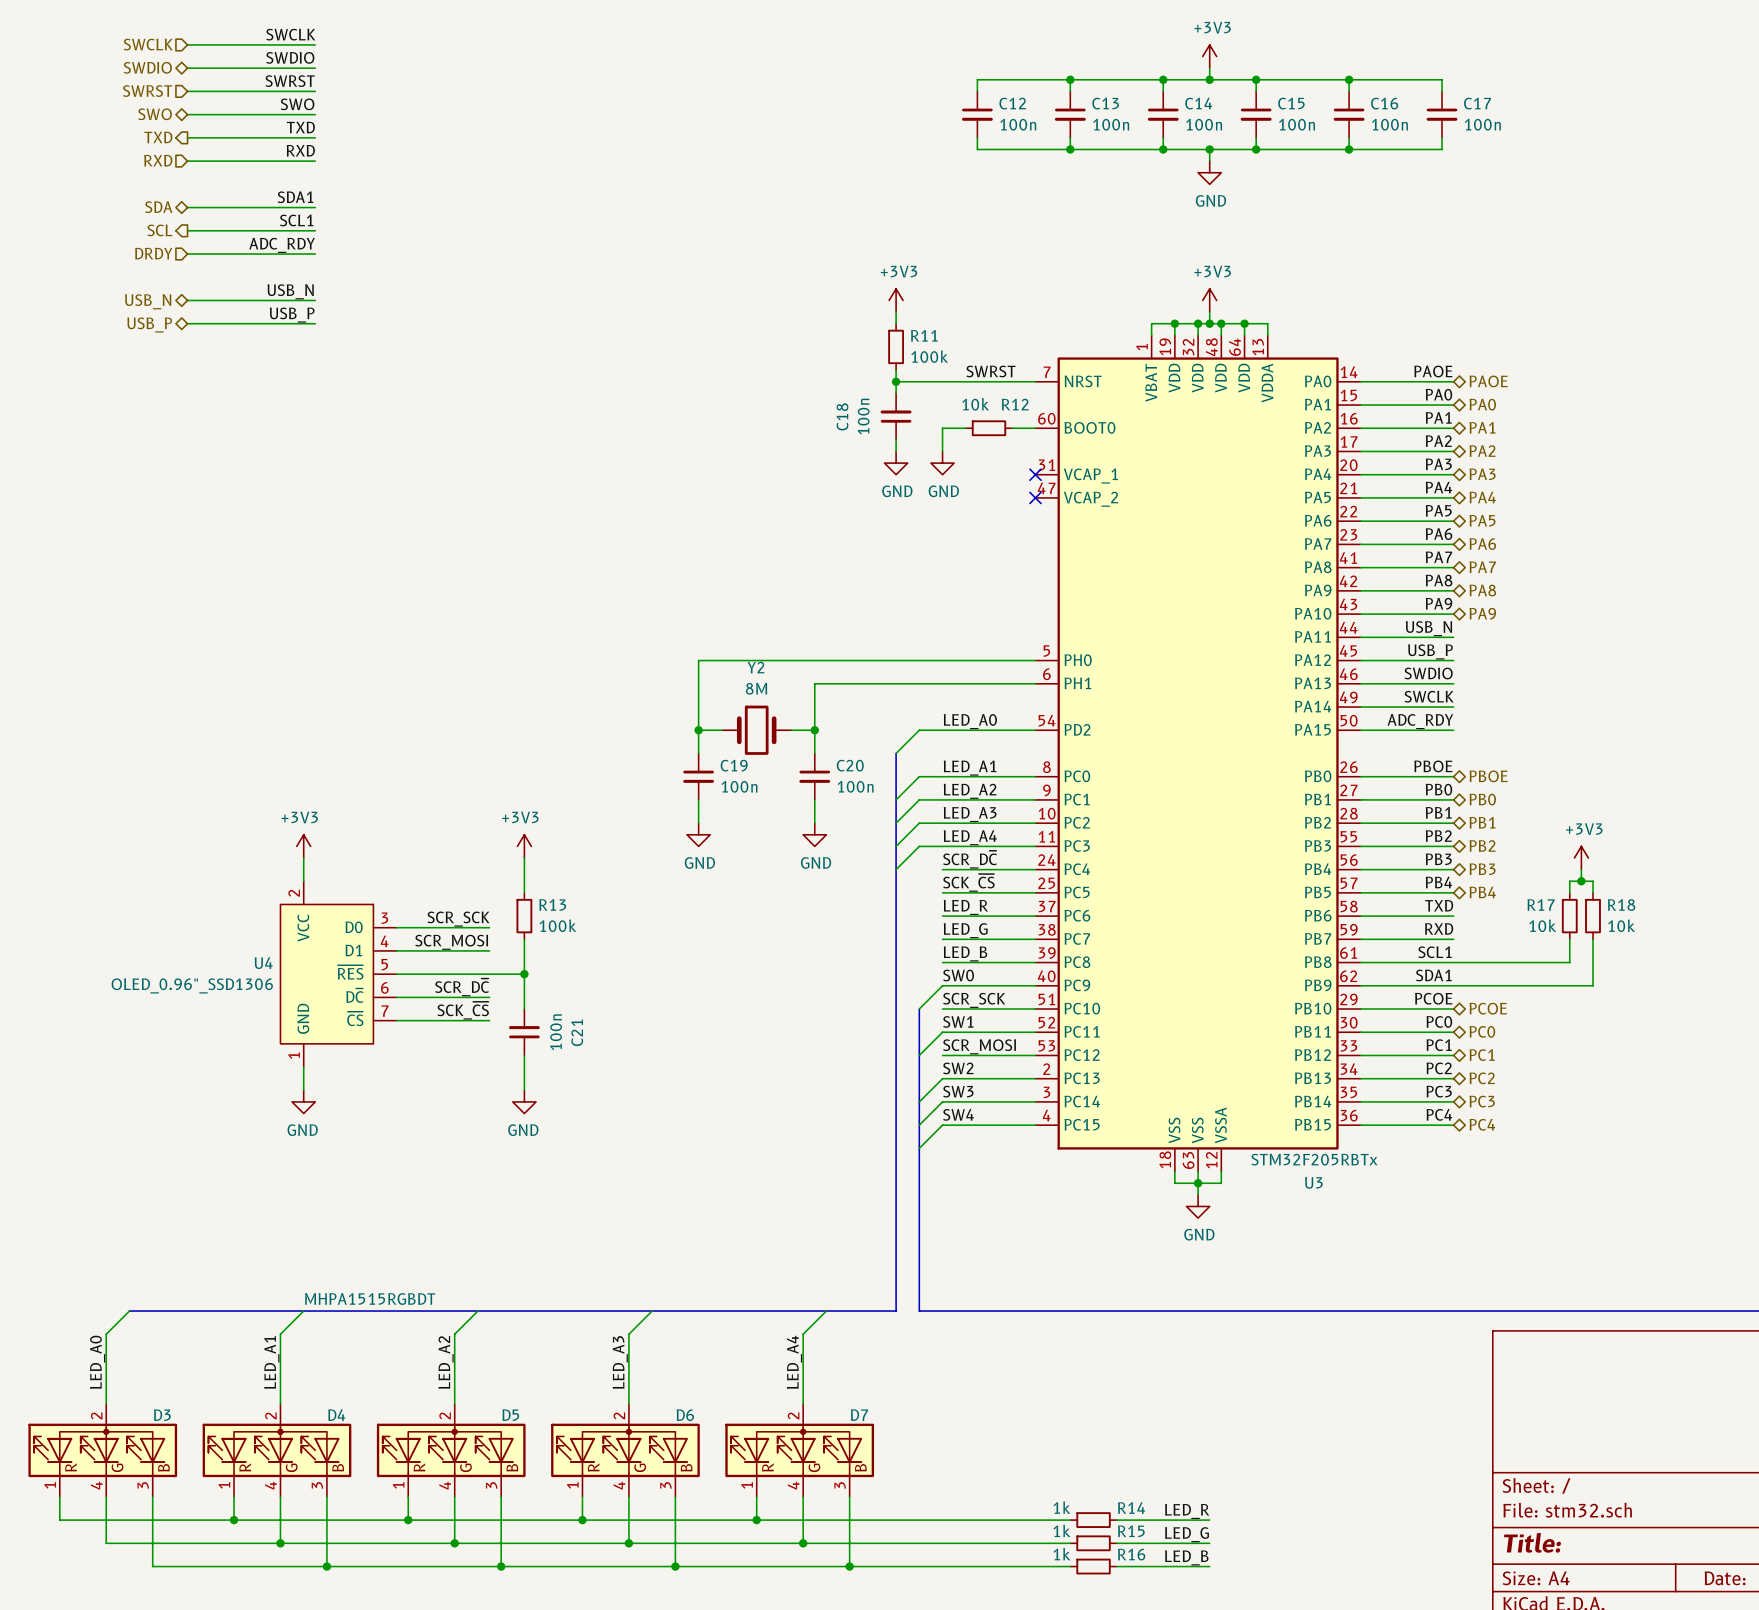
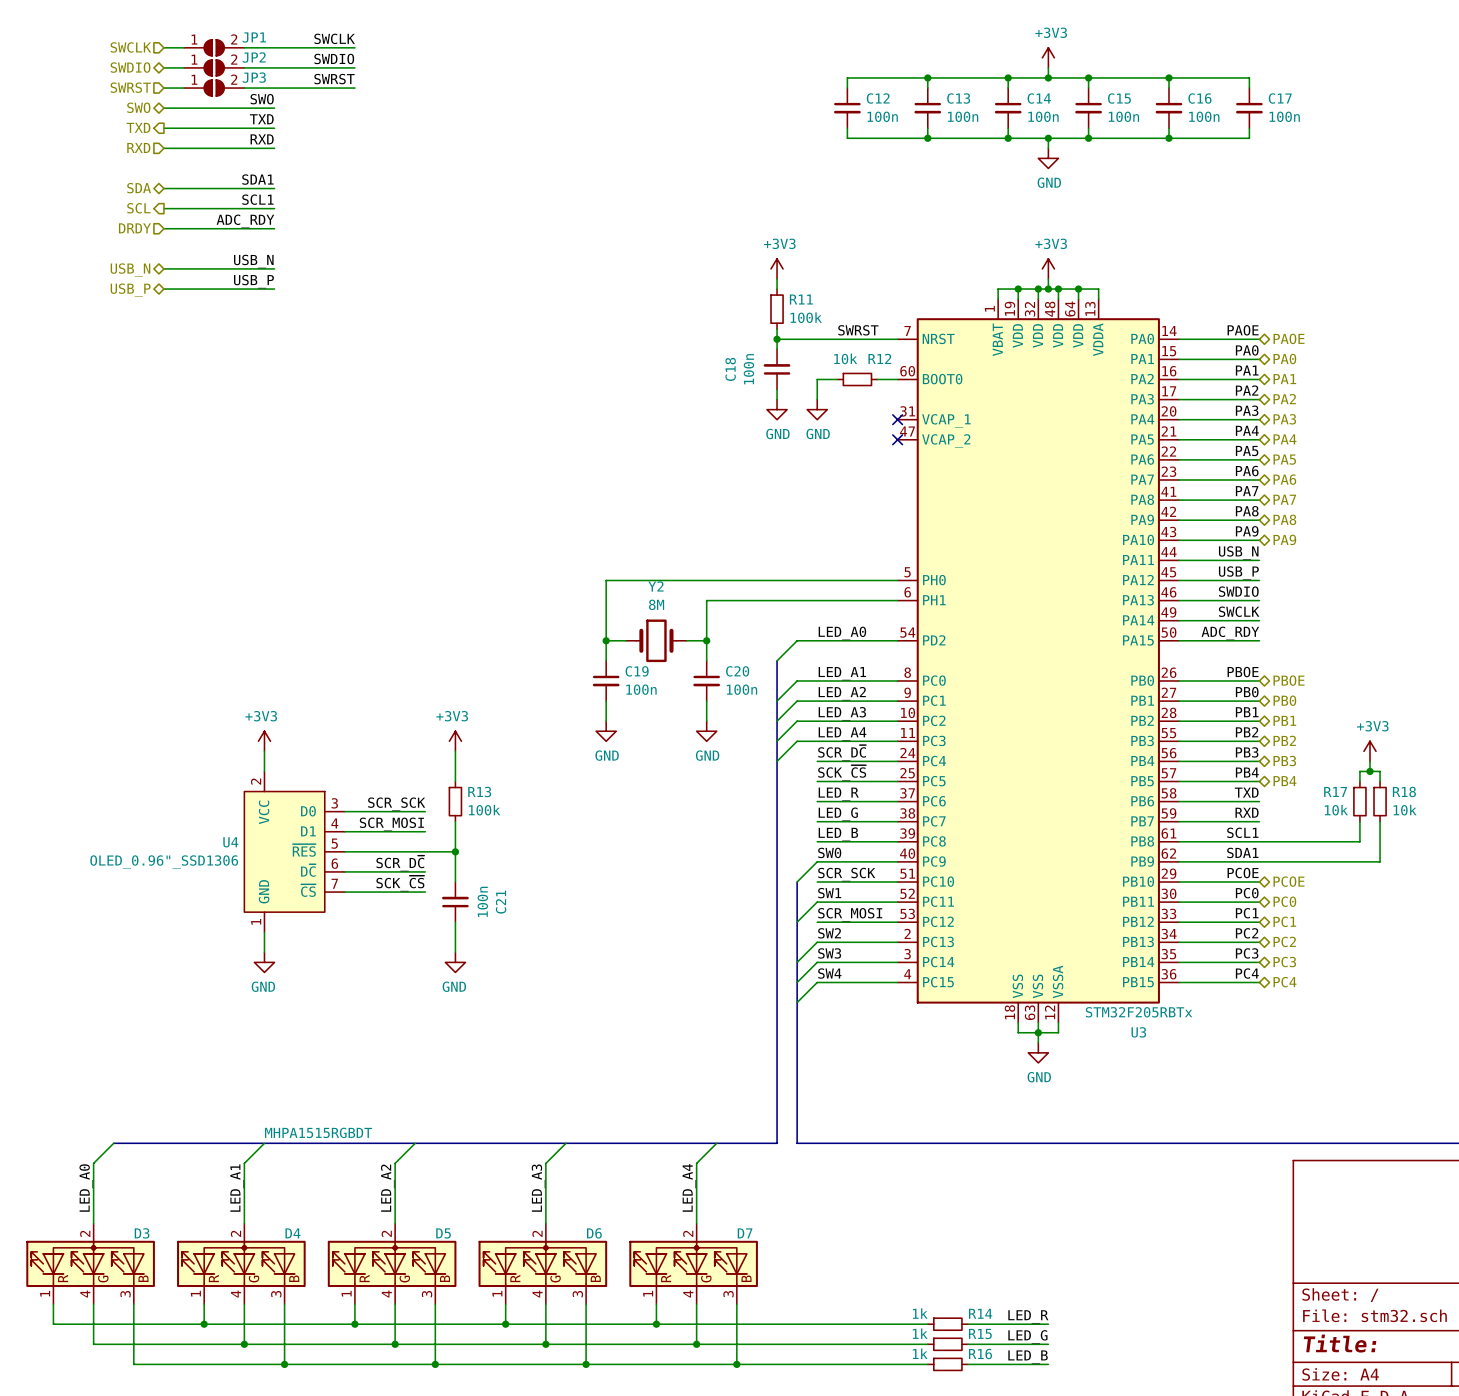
label position: SWCLK (290, 34) -> SWCLK (334, 38)
JP1: none -> (214, 47)
wire: none -> (274, 47) (354, 47)
label position: SWDIO (290, 57) -> SWDIO (334, 58)
JP2: none -> (214, 67)
wire: none -> (274, 67) (354, 67)
label position: SWRST (290, 81) -> SWRST (334, 79)
JP3: none -> (214, 88)
wire: none -> (274, 88) (354, 88)

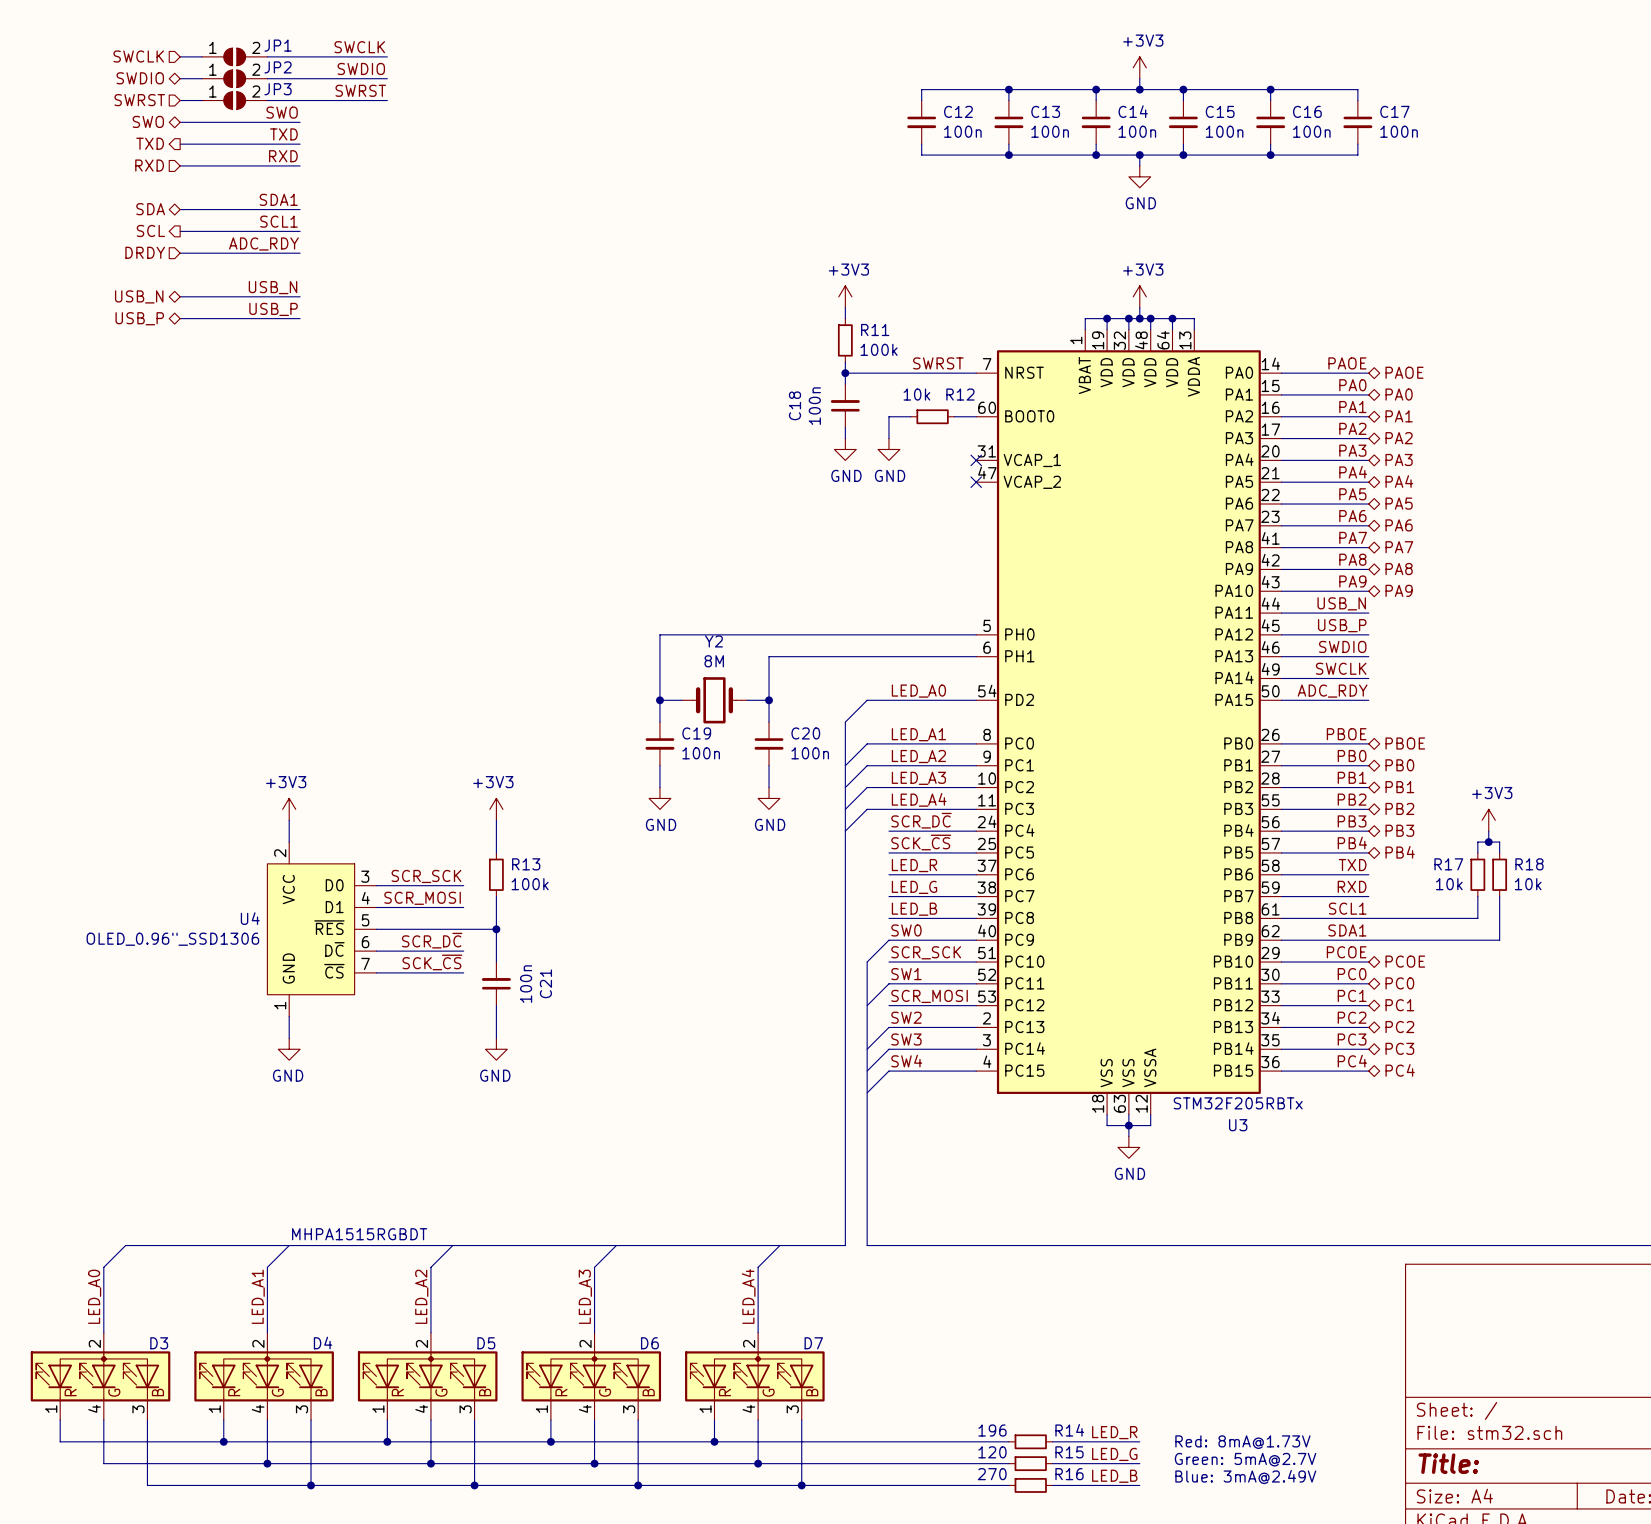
R14 value: 1k (920, 1313) -> 196 (992, 1430)
text: none -> Red: 8mA@1.73V (1242, 1442)
R15 value: 1k (920, 1333) -> 120 (992, 1452)
text: none -> Green: 5mA@2.7V (1245, 1459)
R16 value: 1k (920, 1353) -> 270 (992, 1474)
text: none -> Blue: 3mA@2.49V (1245, 1477)

